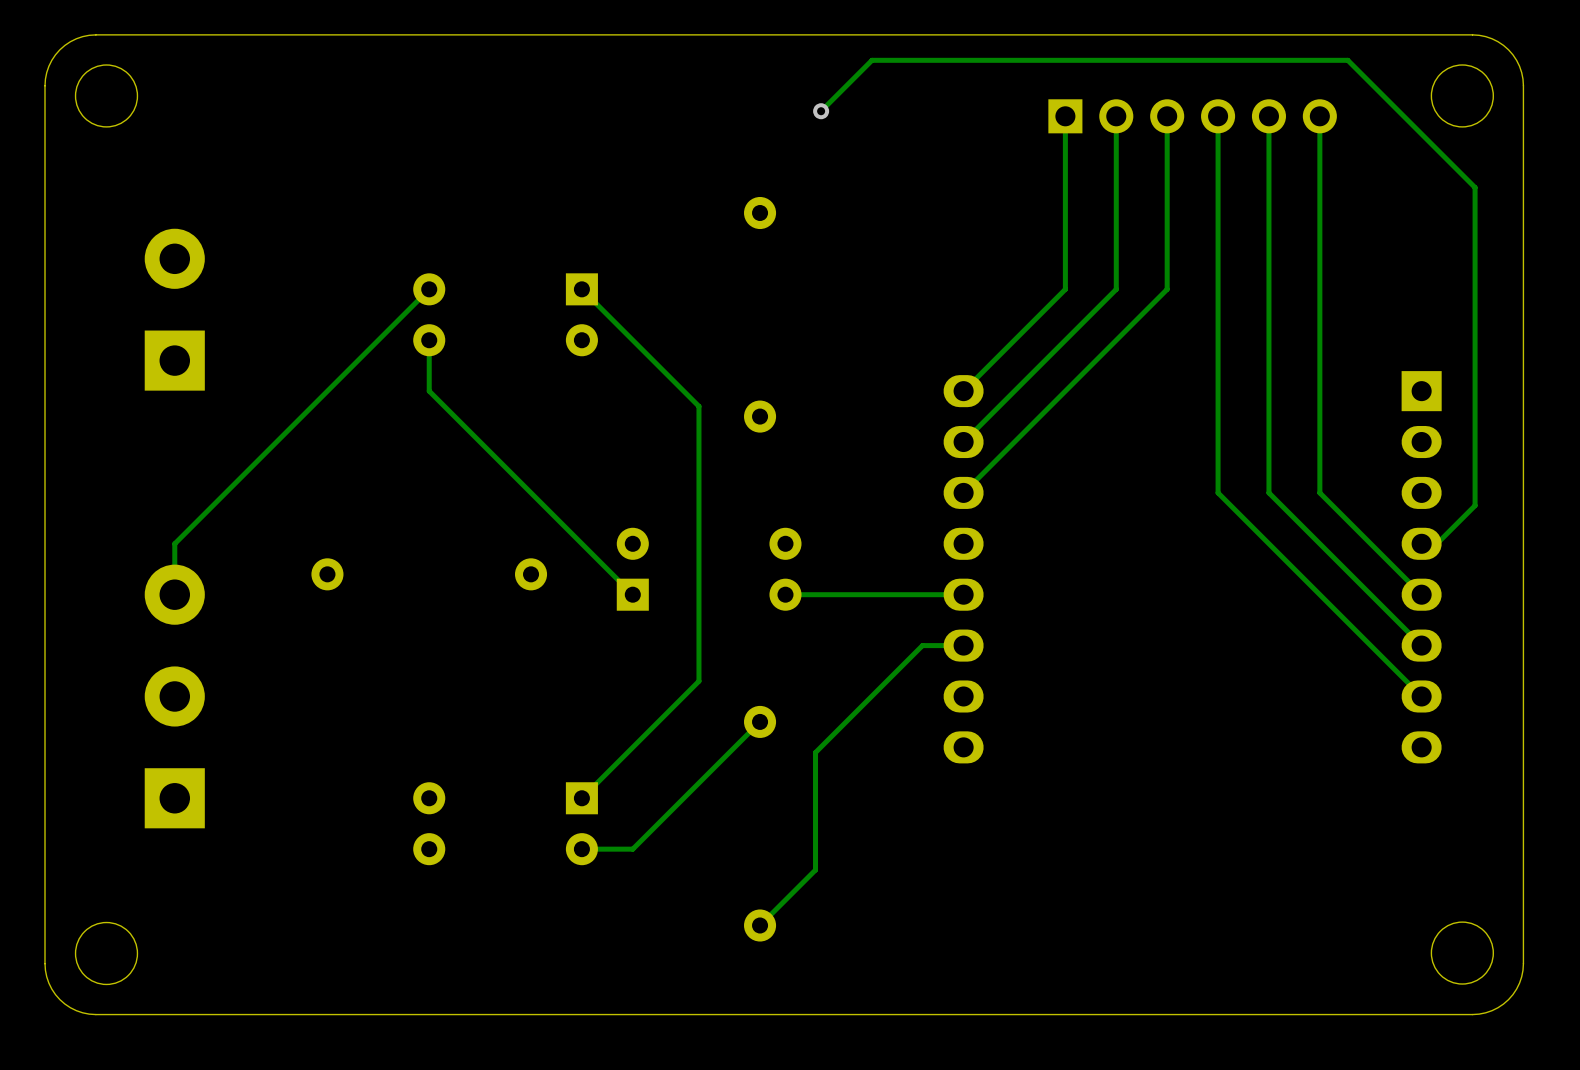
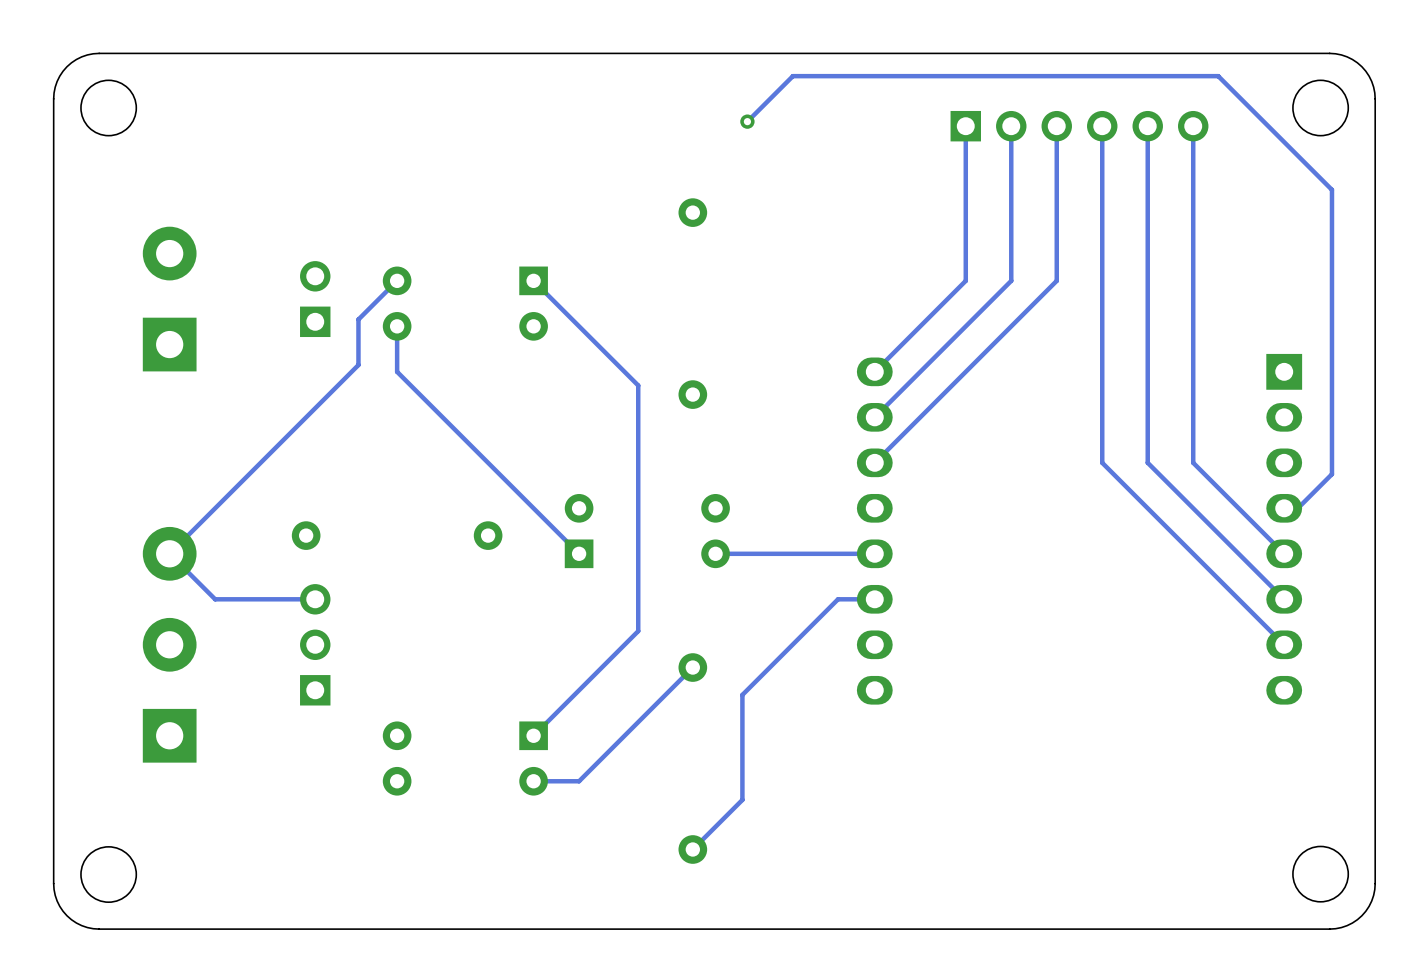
part: none -> (315, 299)
track: (385, 332) (174, 543) (174, 594) -> (358, 319) (358, 365) (169, 553) (215, 599) (315, 599)
part: none -> (315, 644)

